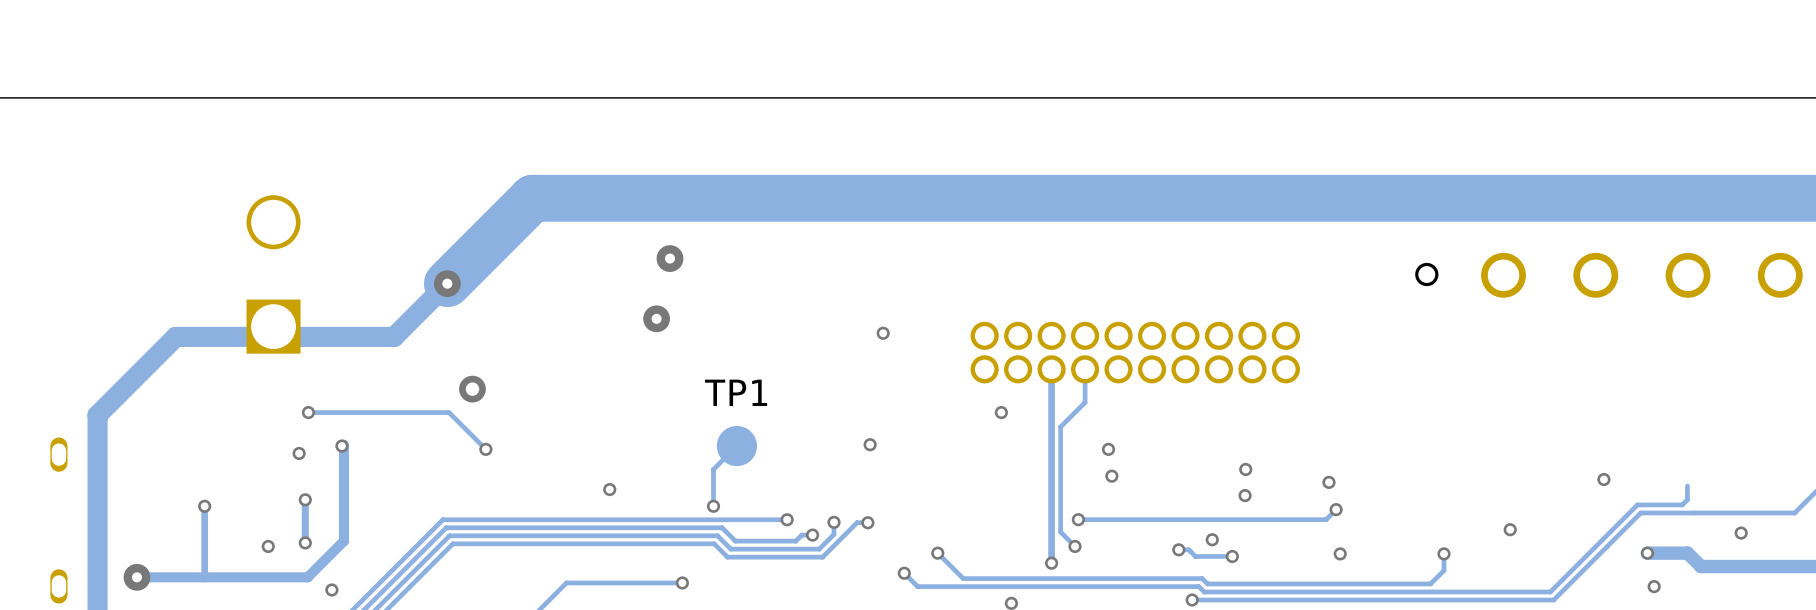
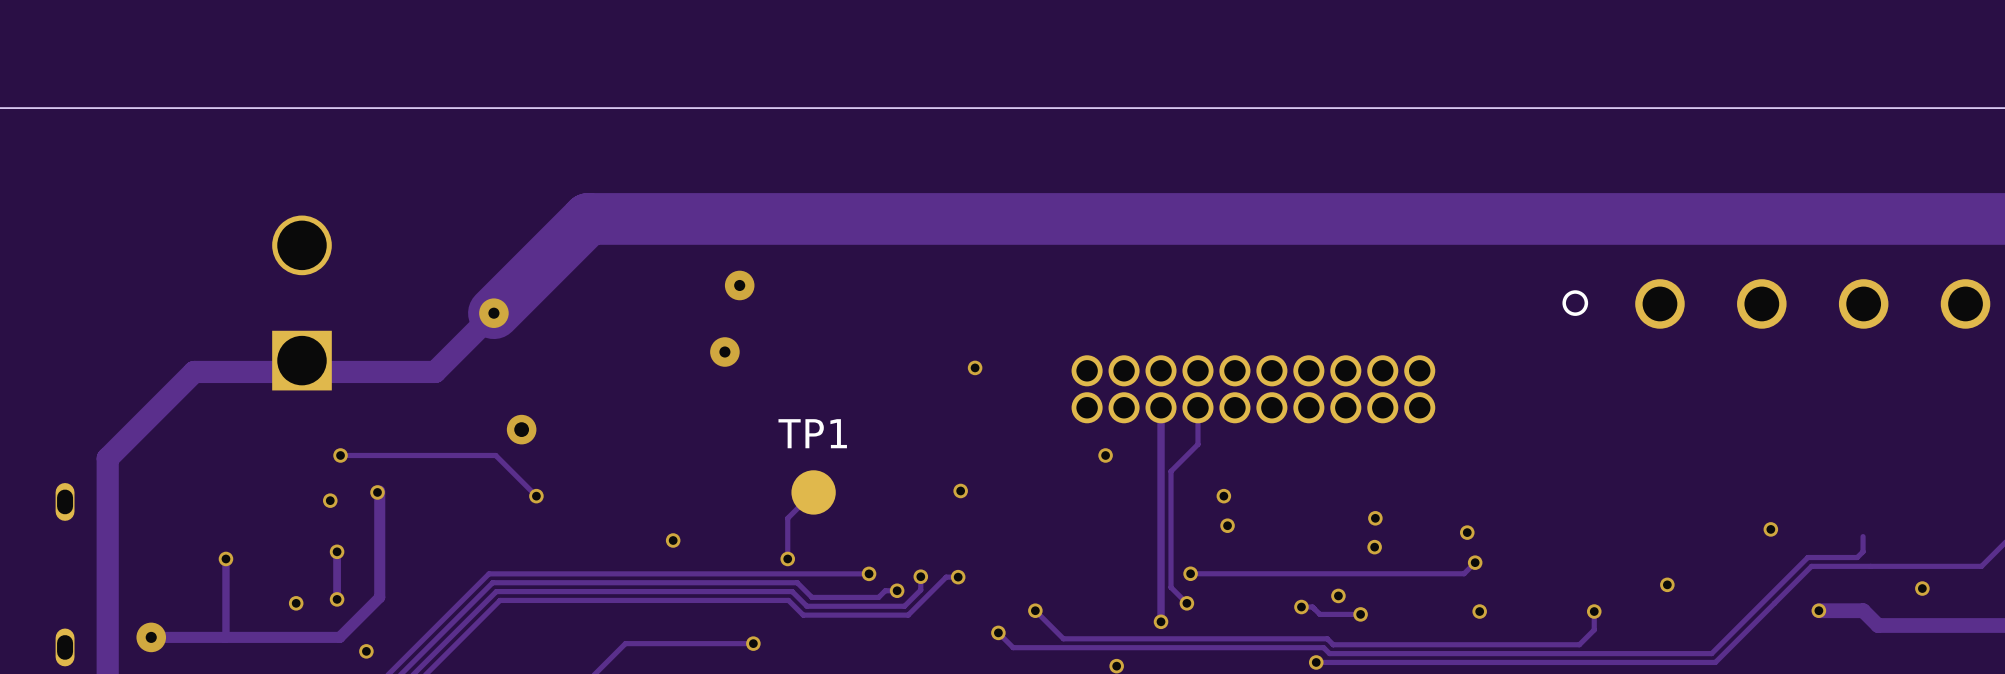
via: (1654, 586) -> none

